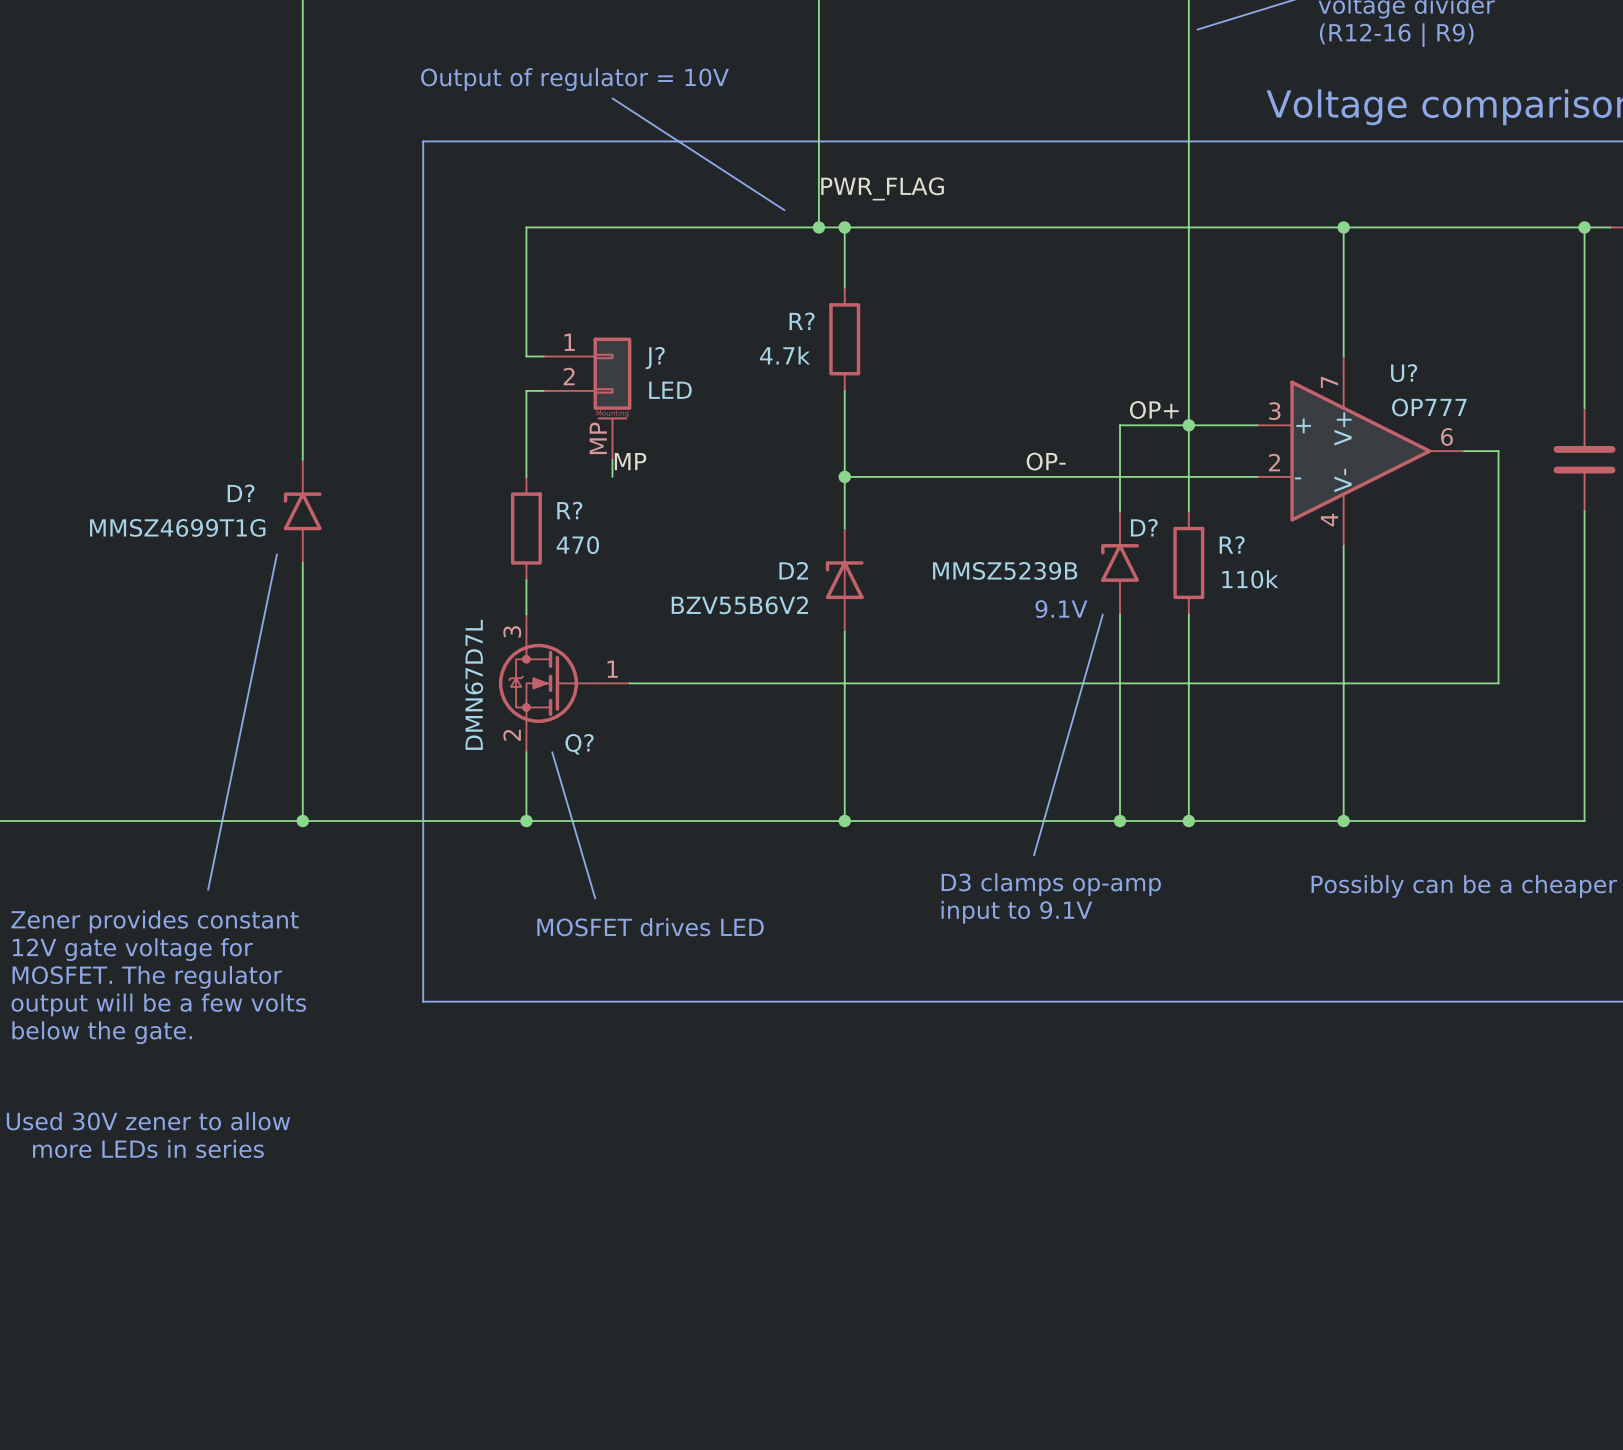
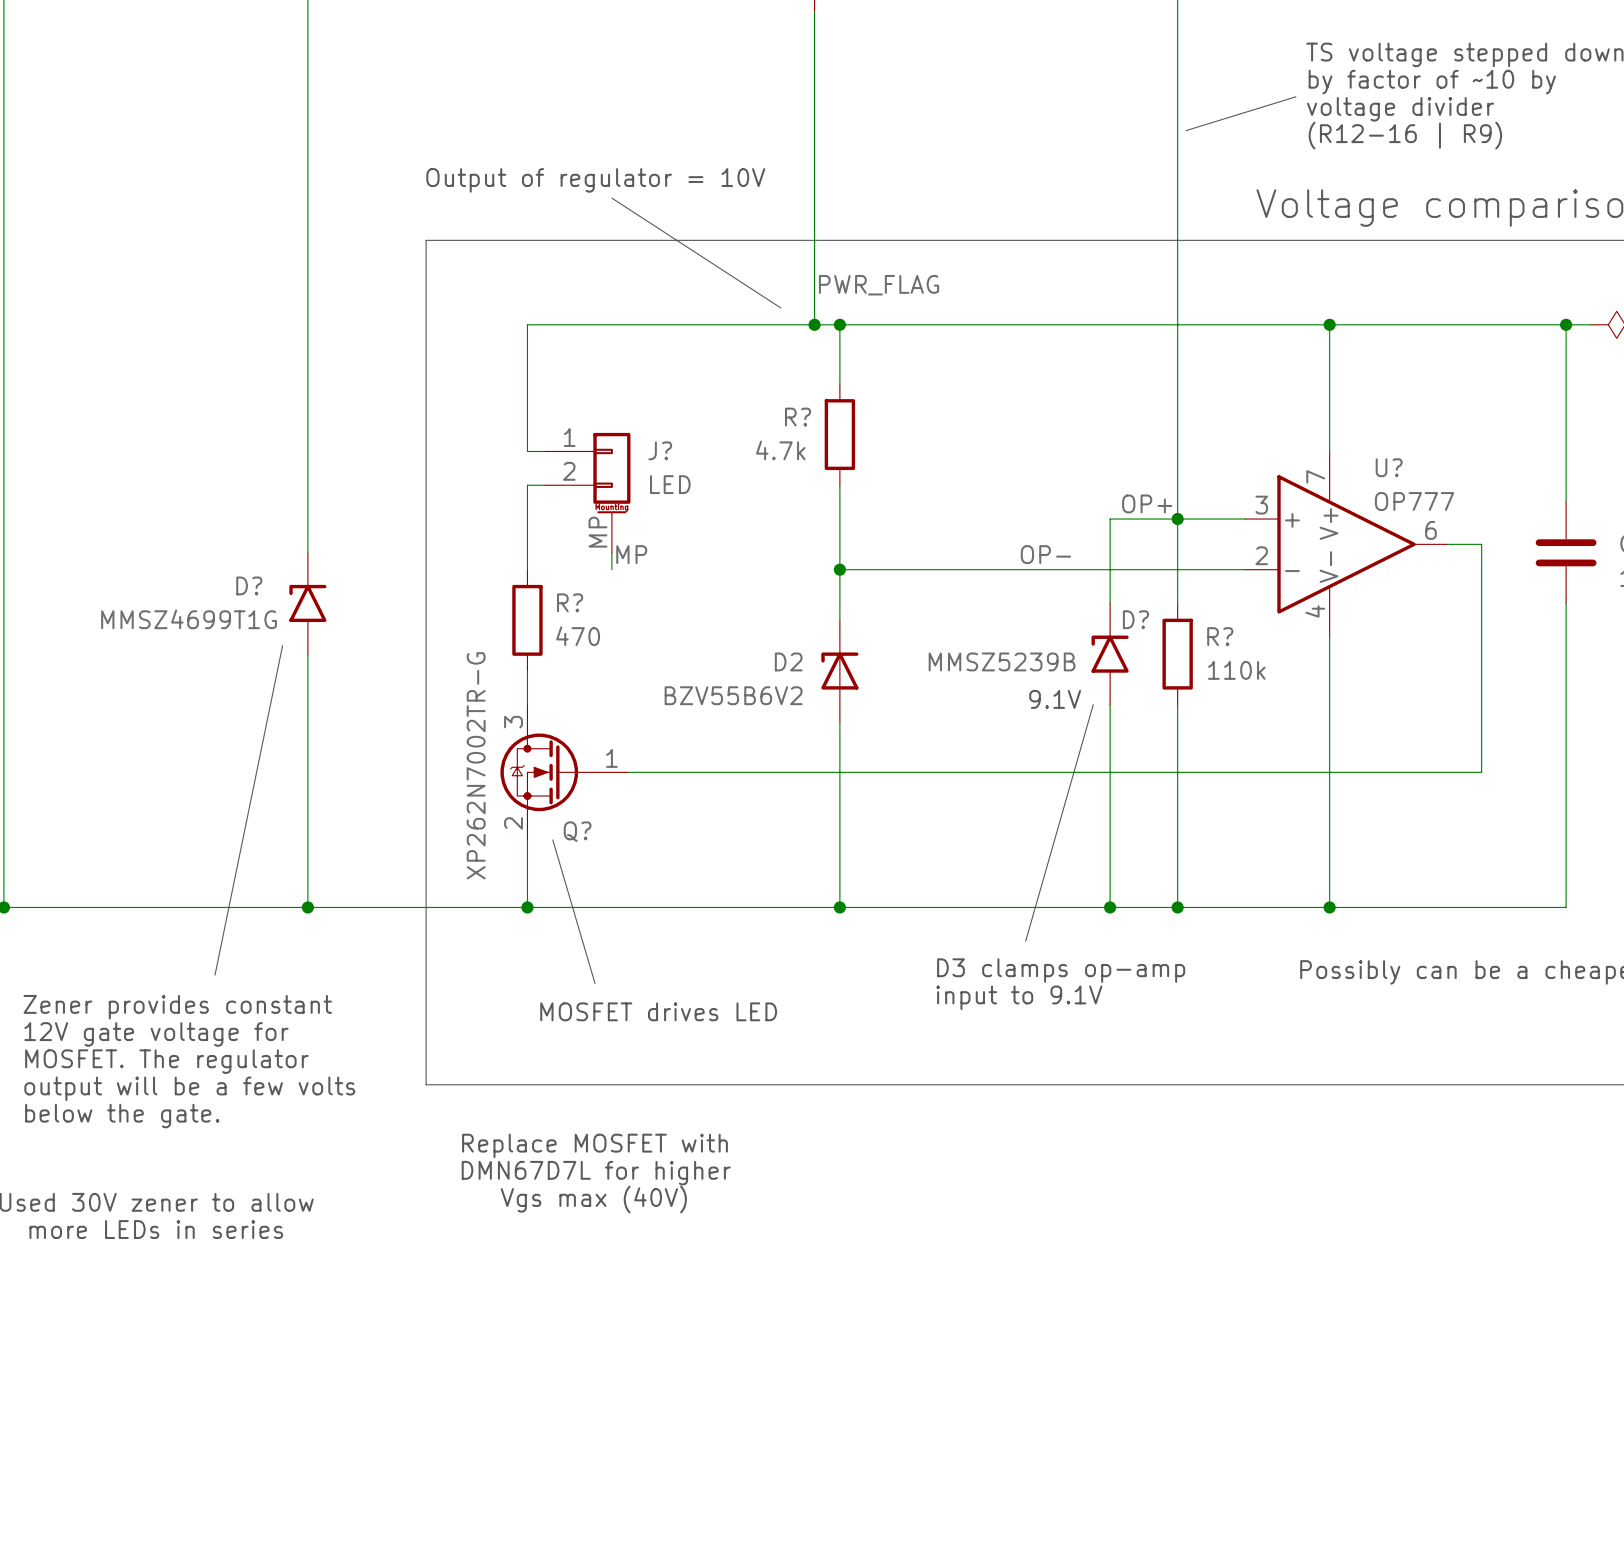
Q? value: DMN67D7L (474, 684) -> XP262N7002TR-G (476, 765)
text: none -> Replace MOSFET with (595, 1145)
text: none -> DMN67D7L for higher (596, 1173)
text: none -> Vgs max (40V) (593, 1199)

